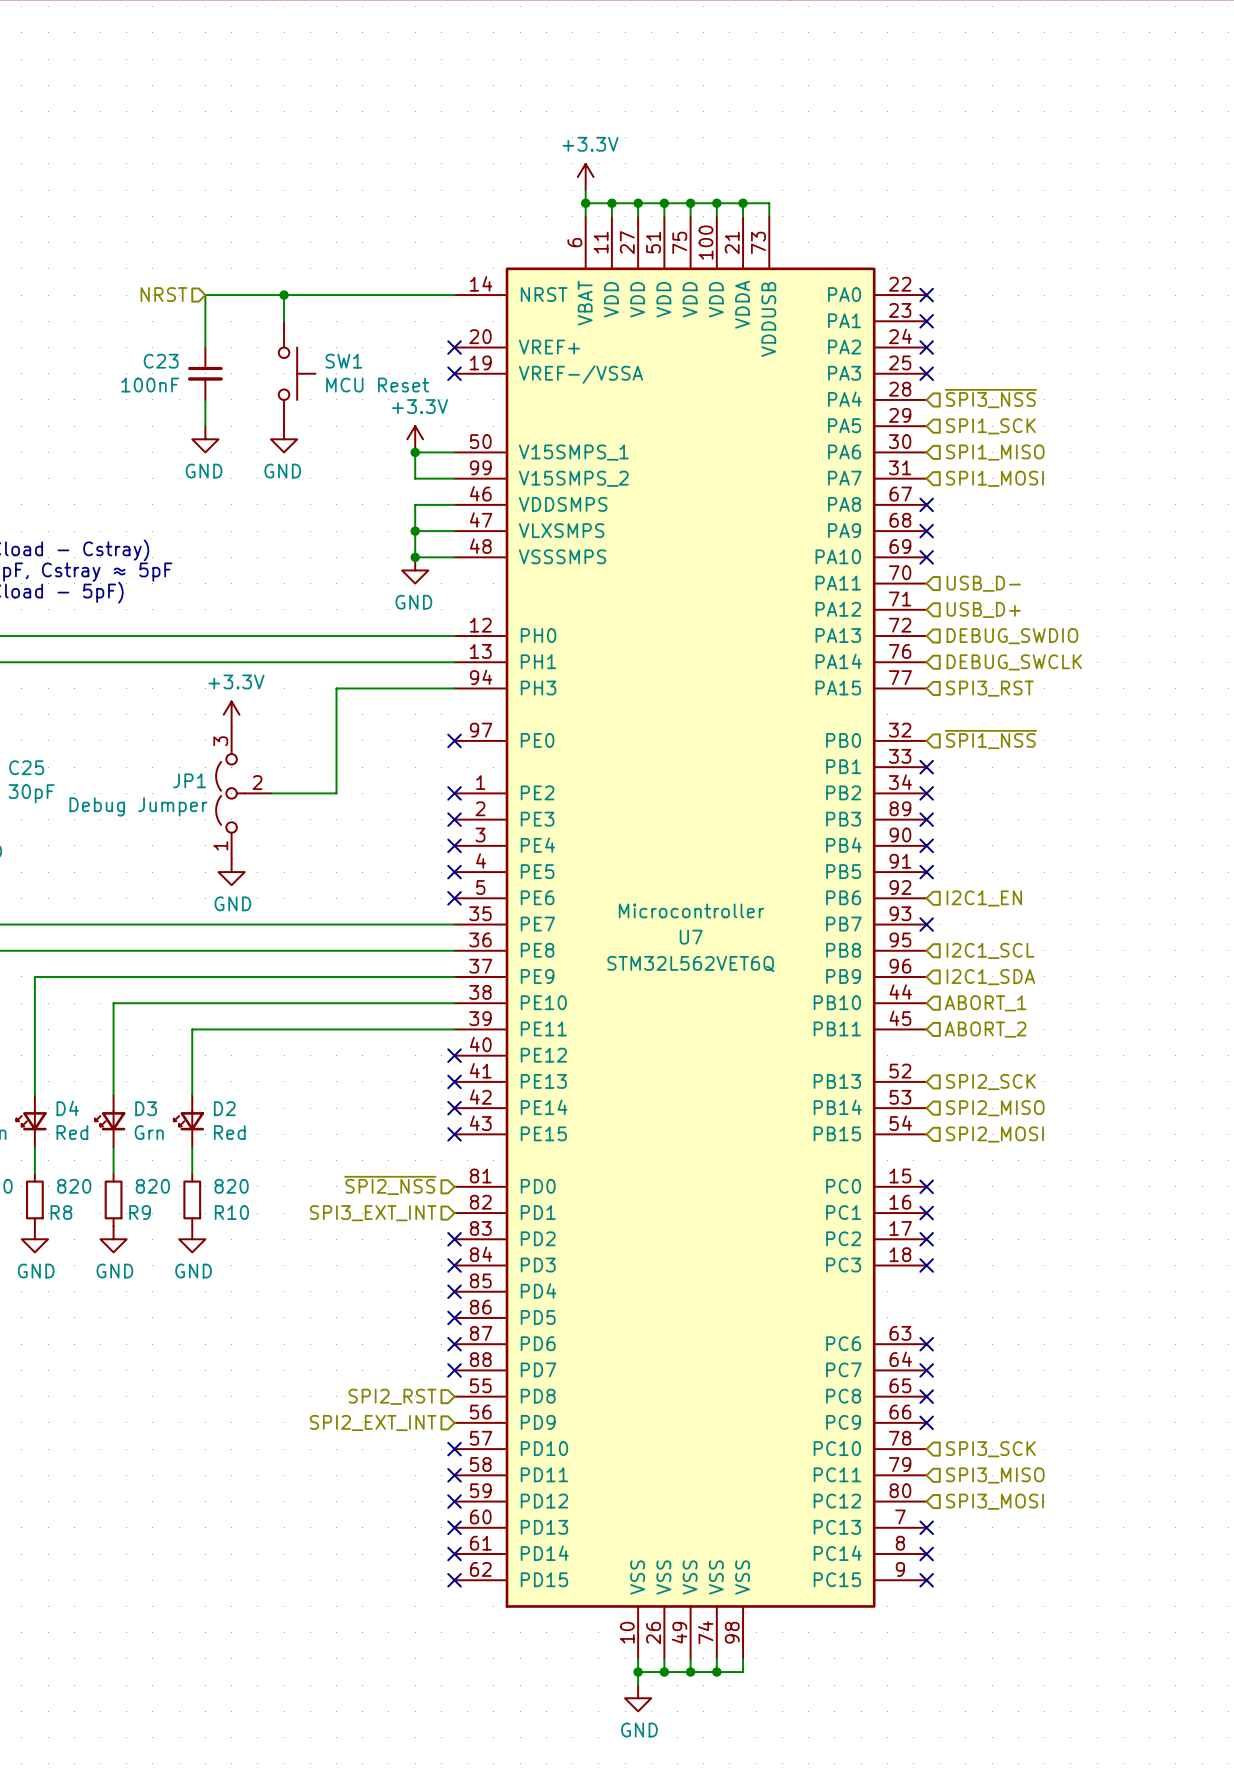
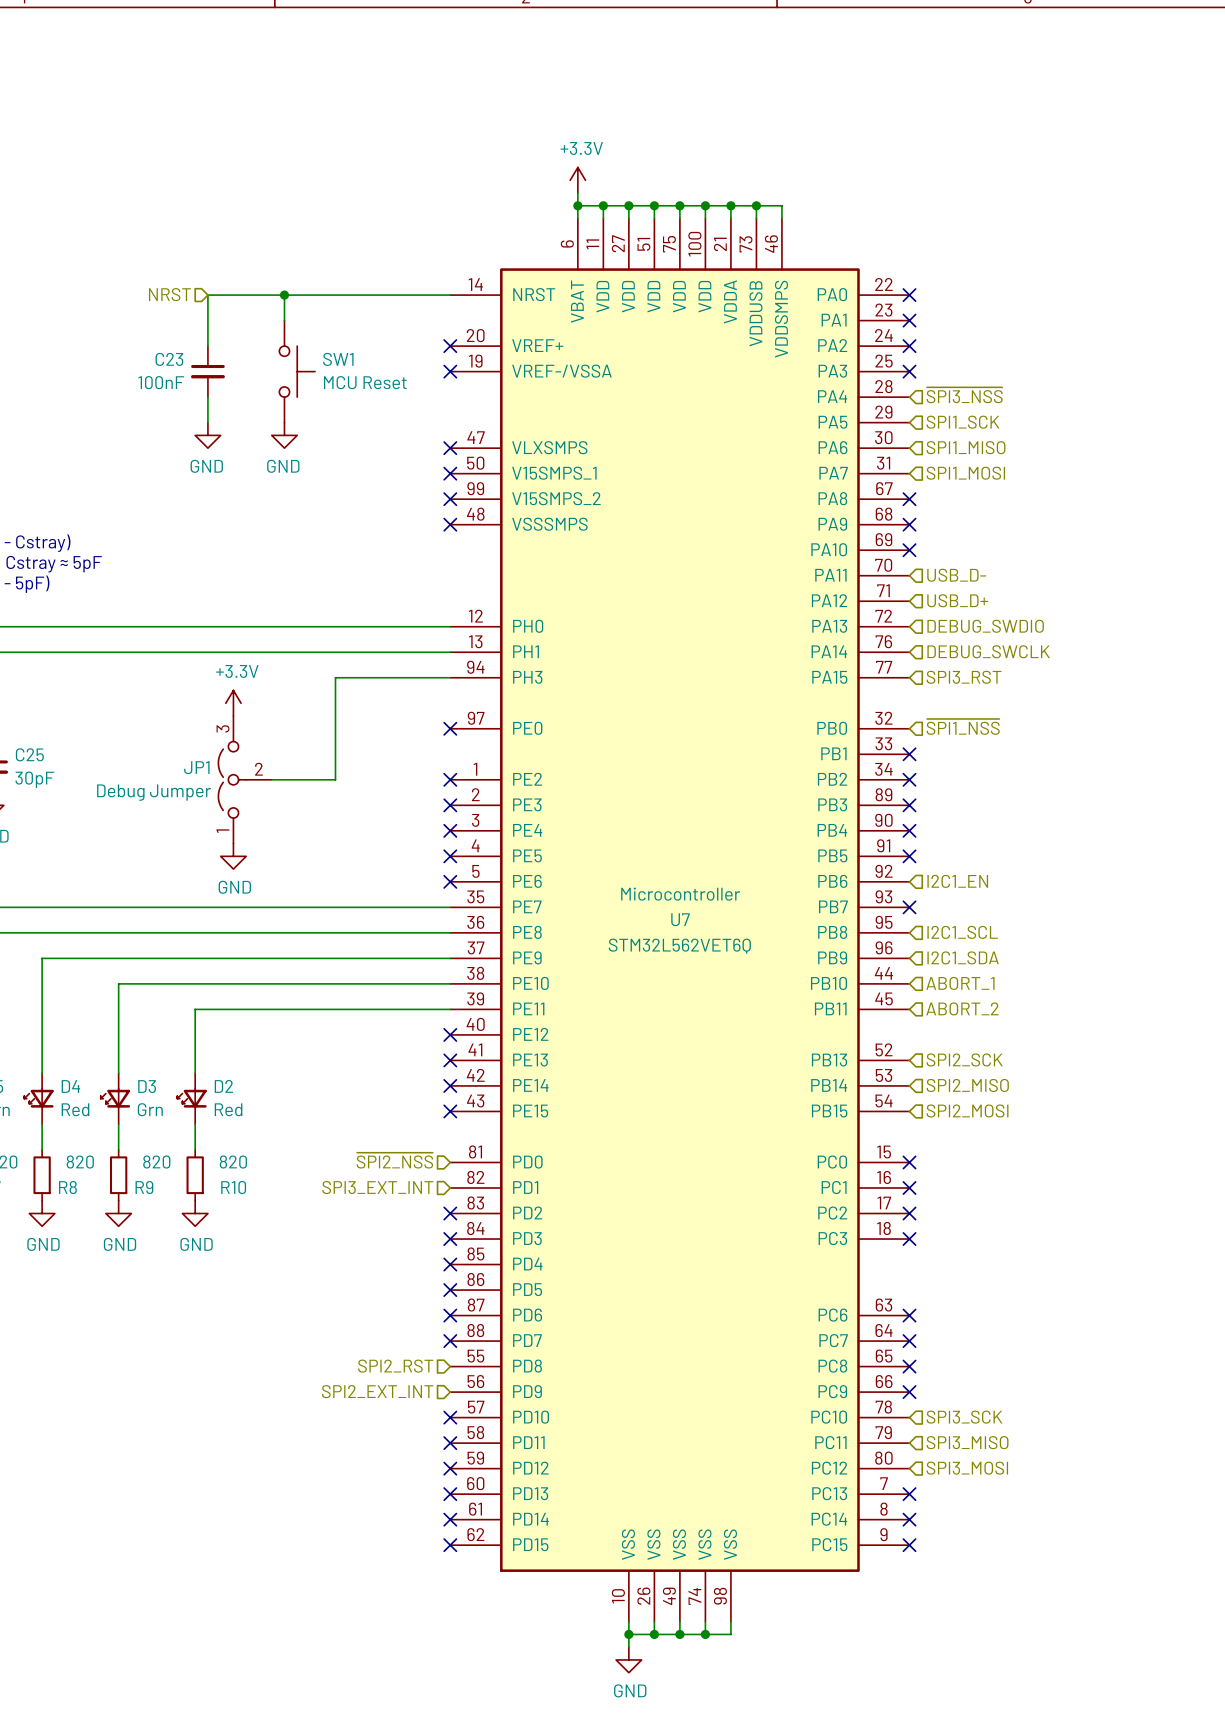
wire: none -> (756, 205) (781, 205) (781, 218)
junction: none -> (756, 205)
U7 symbol: [454, 216, 927, 1659] -> [450, 218, 910, 1622]
power symbol: +3.3V (415, 439) -> none
junction: (415, 452) -> none
wire: (454, 452) (415, 452) (415, 478) (454, 478) -> none
no-connect mark: none -> (450, 448)
no-connect mark: none -> (450, 473)
wire: (454, 504) (415, 504) (415, 557) (454, 557) -> none
no-connect mark: none -> (450, 499)
wire: (415, 531) (454, 531) -> none
junction: (415, 531) -> none
no-connect mark: none -> (450, 524)
junction: (415, 557) -> none
power symbol: GND (415, 570) -> none

